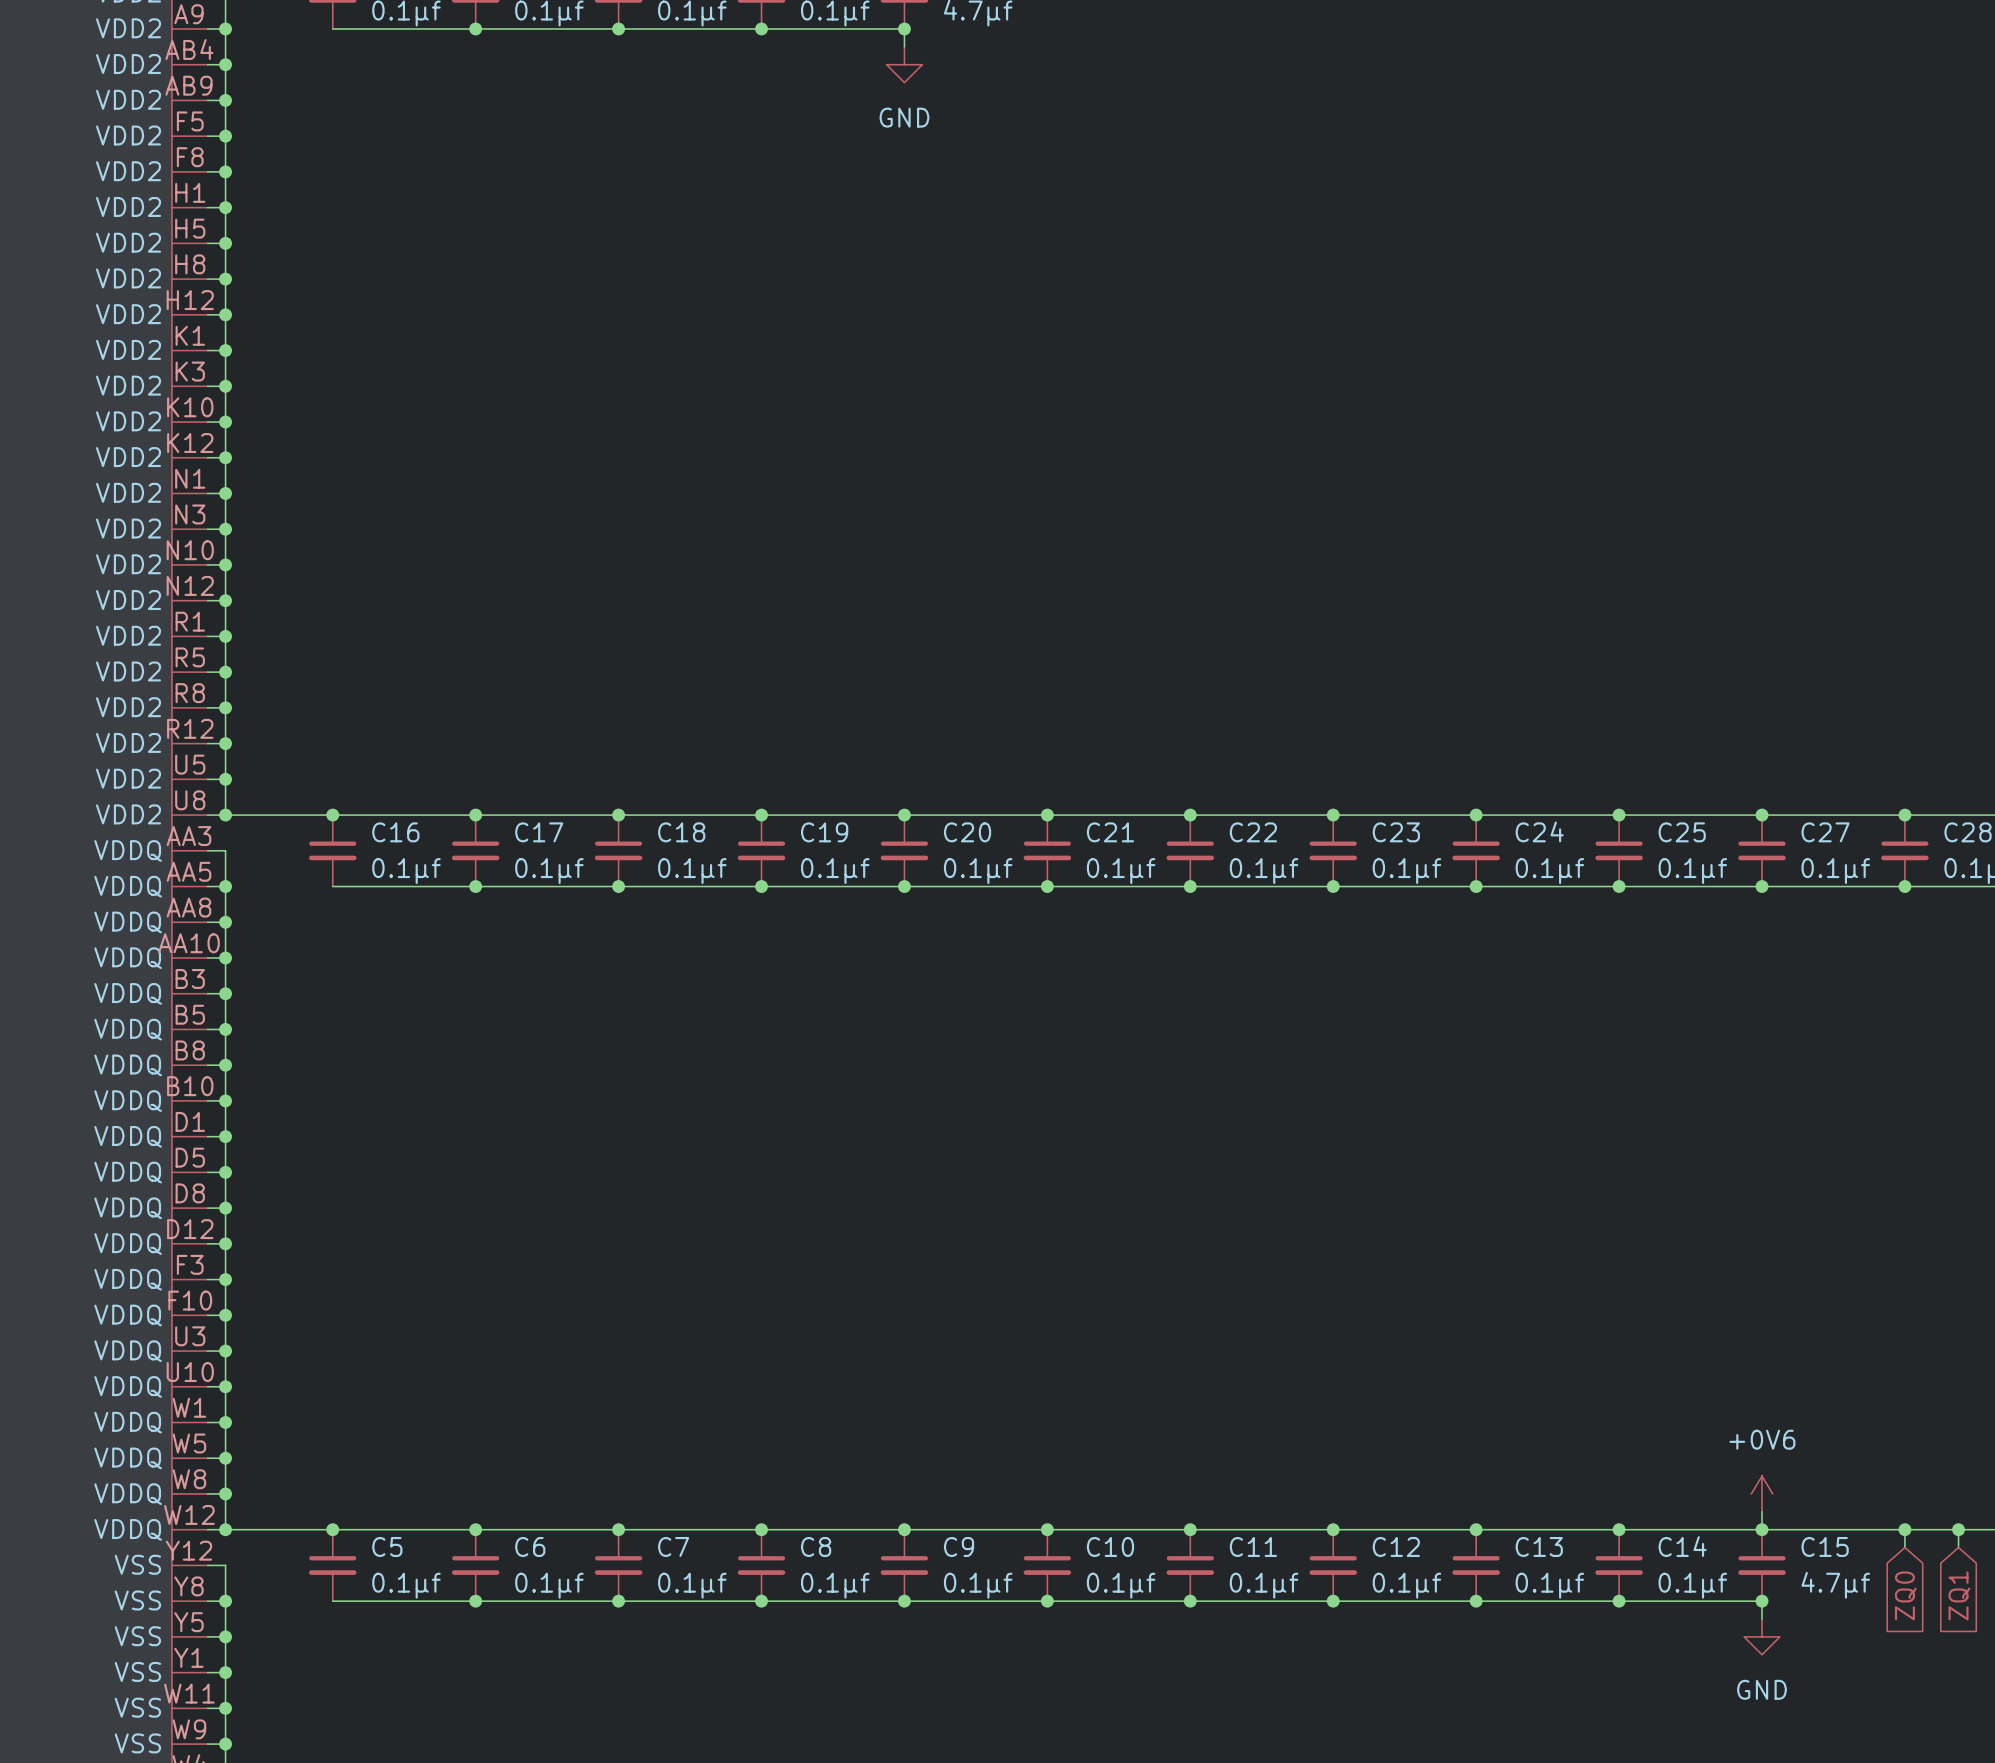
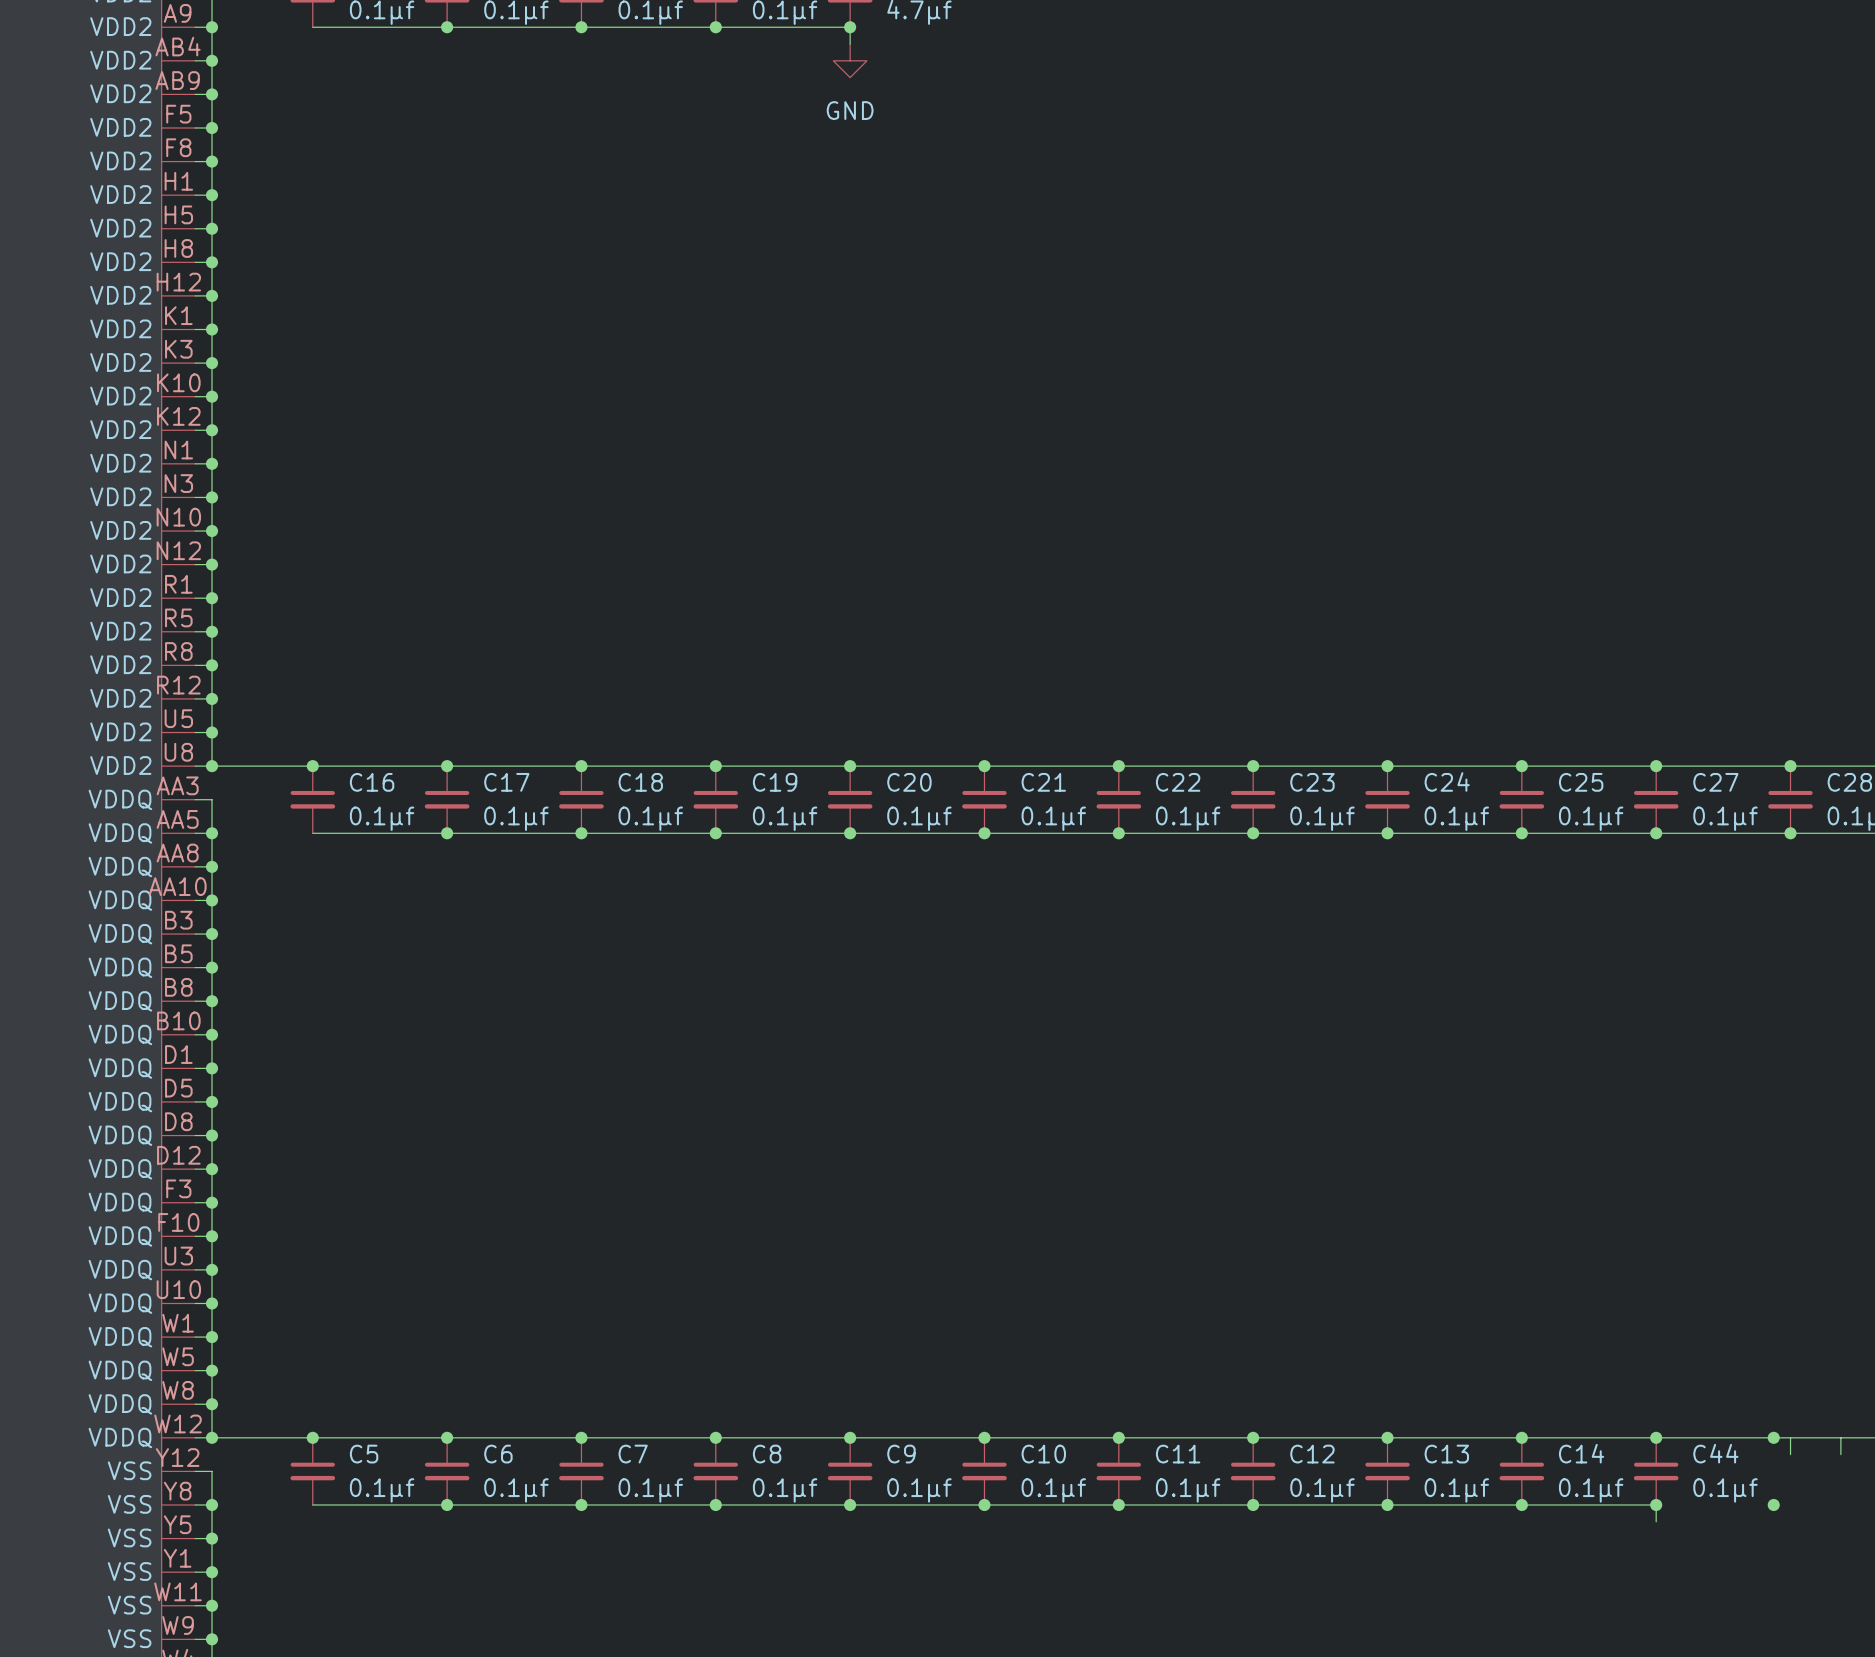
power symbol: +0V6 (1762, 1493) -> none
wire: (1762, 1511) (1762, 1529) -> none
junction position: (1904, 1529) -> (1773, 1437)
junction: (1958, 1529) -> none
C15 name: C15 (1825, 1546) -> C44 (1715, 1453)
C15 value: 4.7μf (1835, 1585) -> 0.1μf (1725, 1490)
global label: ZQ0 (1905, 1595) -> none
global label: ZQ1 (1959, 1595) -> none
junction: none -> (1773, 1504)
power symbol: GND (1762, 1636) -> none

